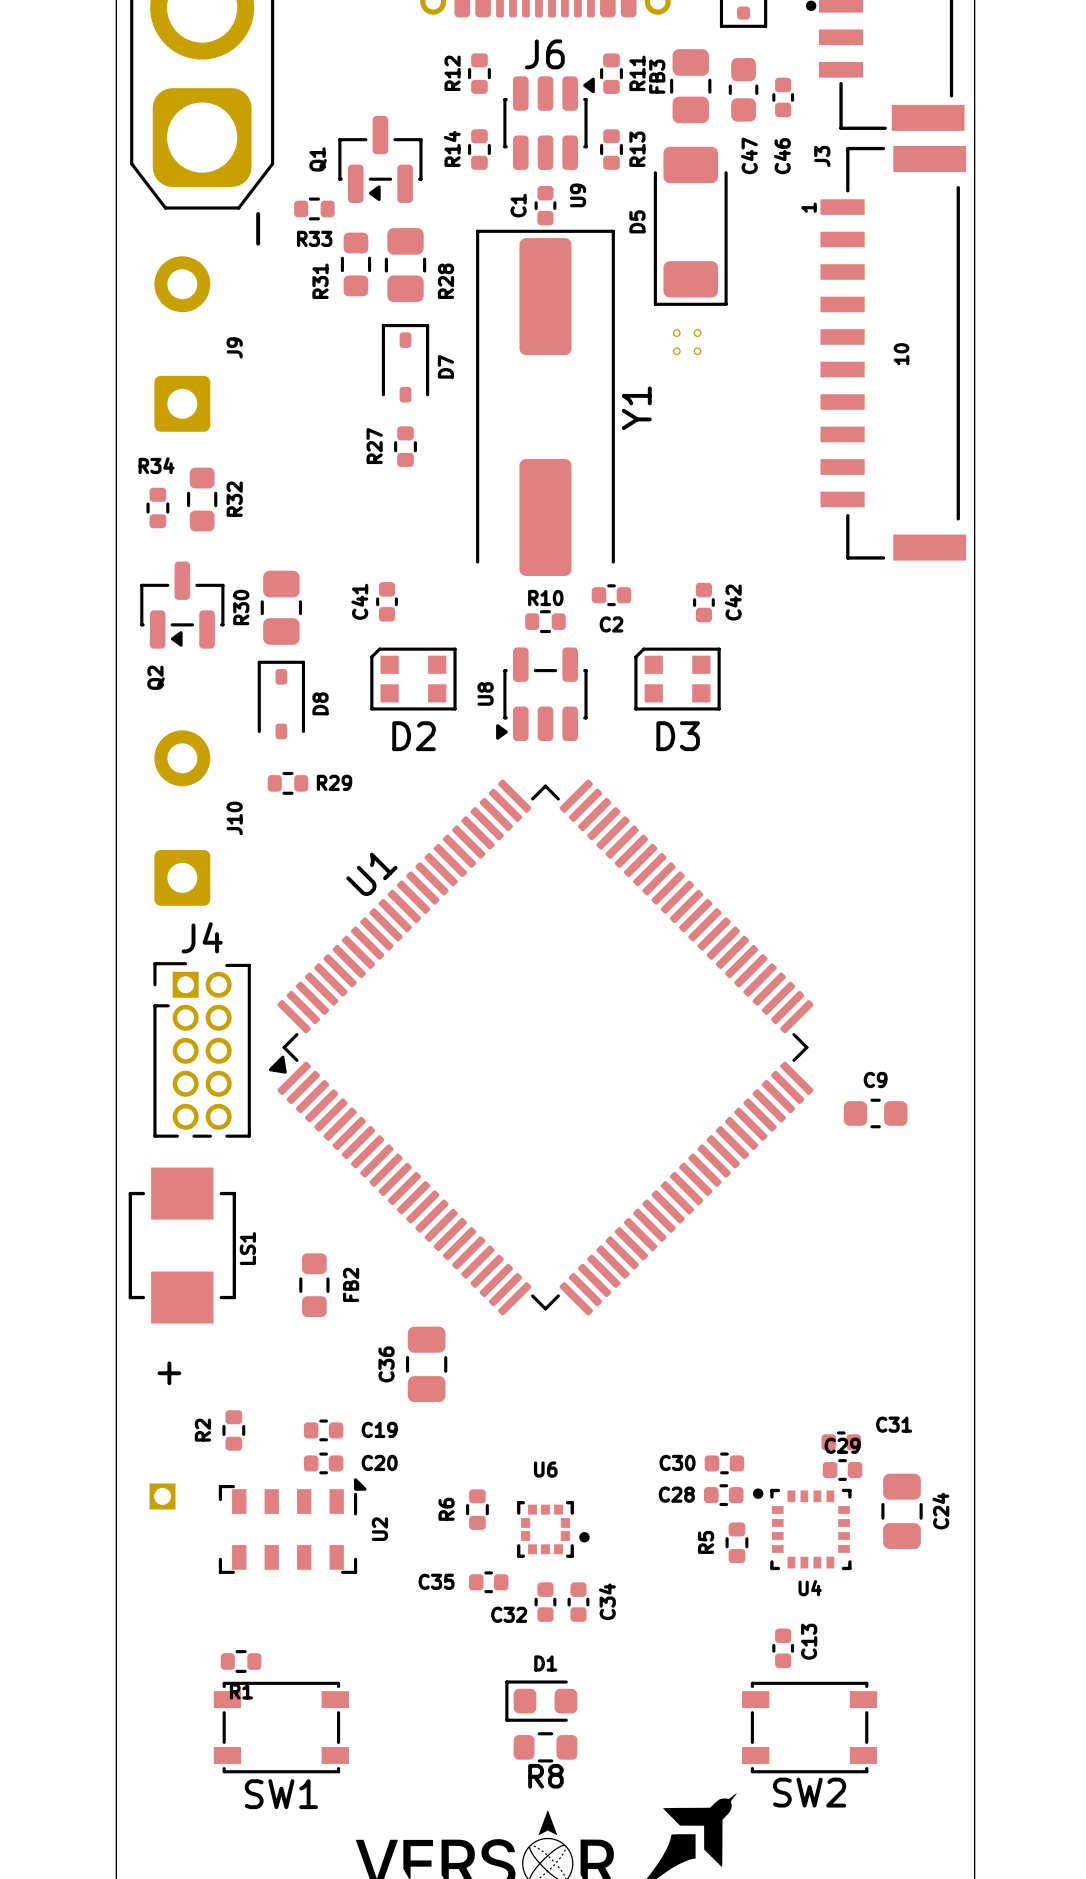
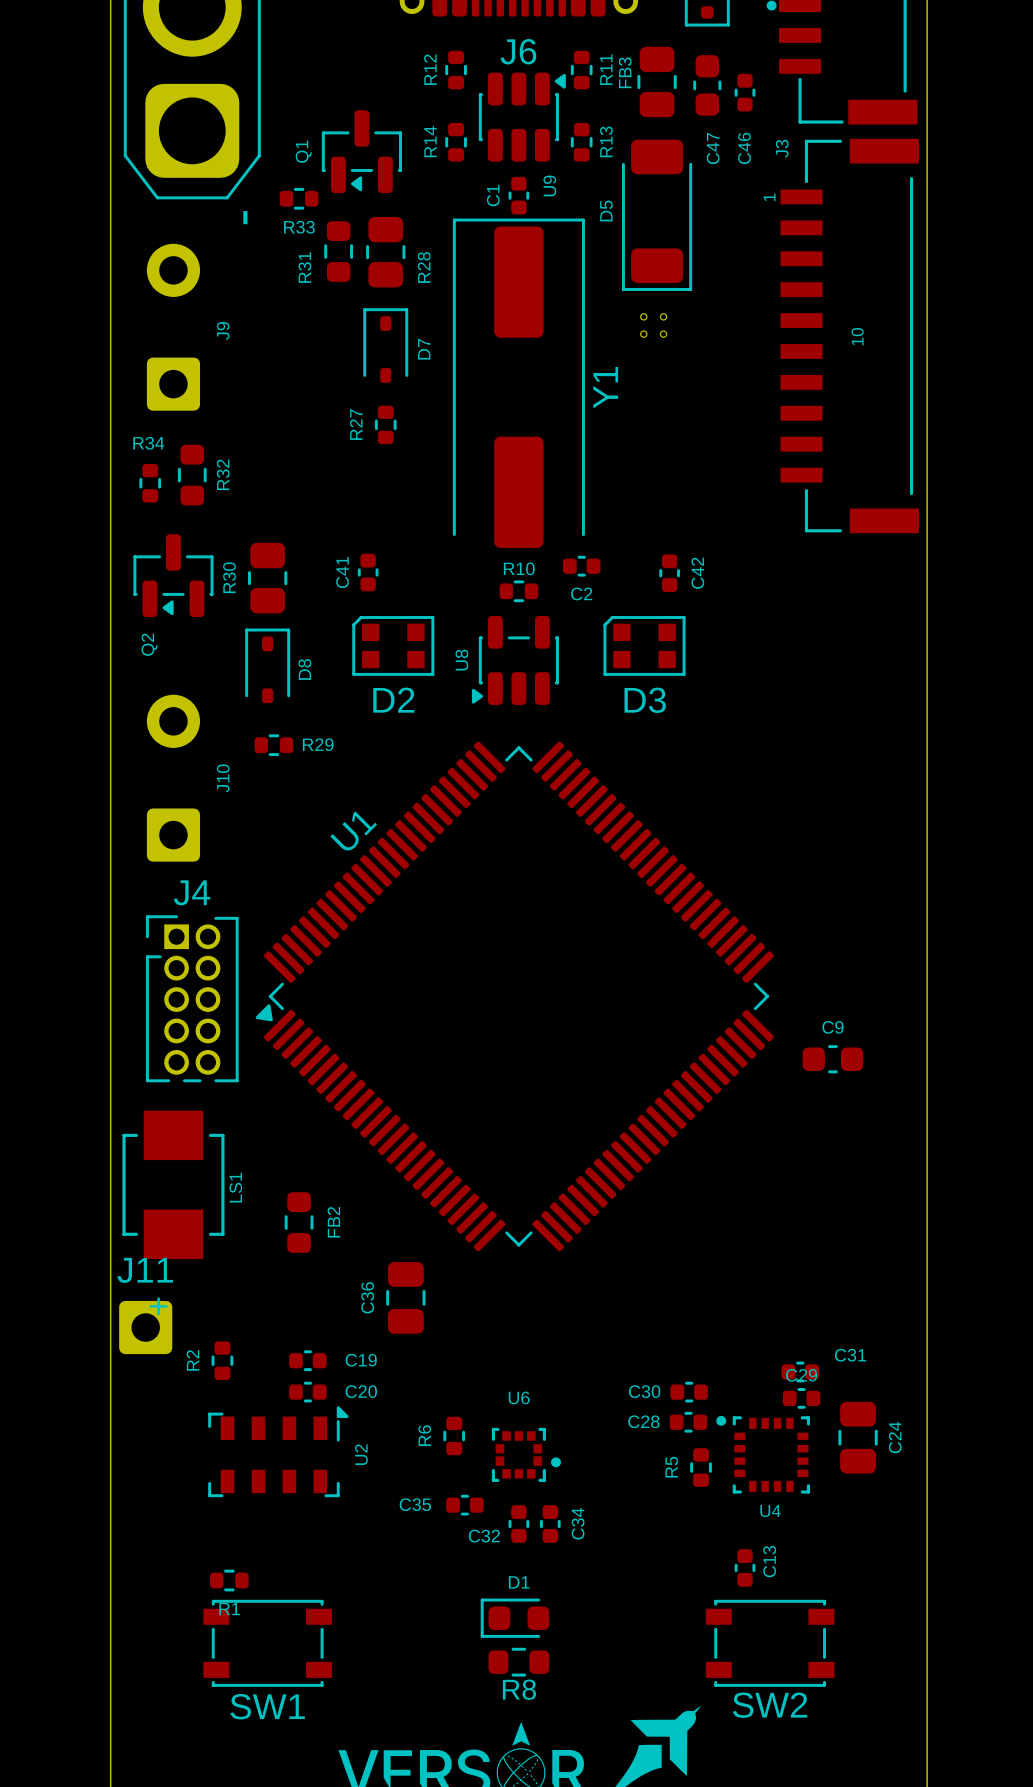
J11: none -> (145, 1327)
part: (162, 1496) -> none

